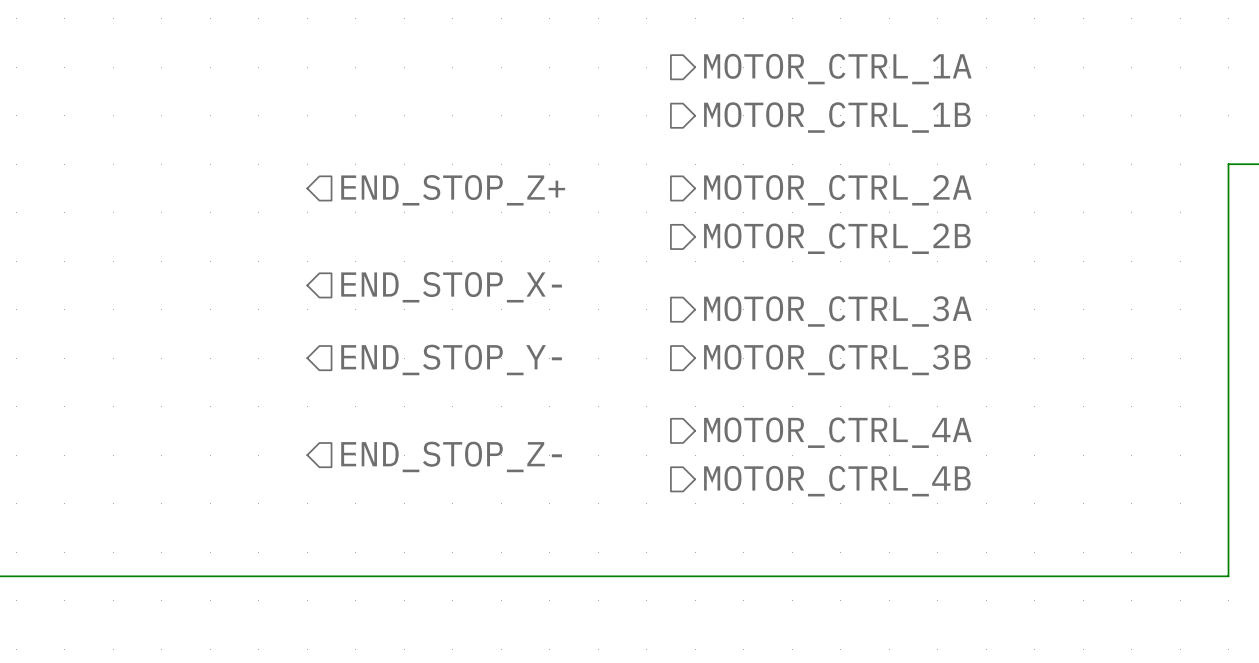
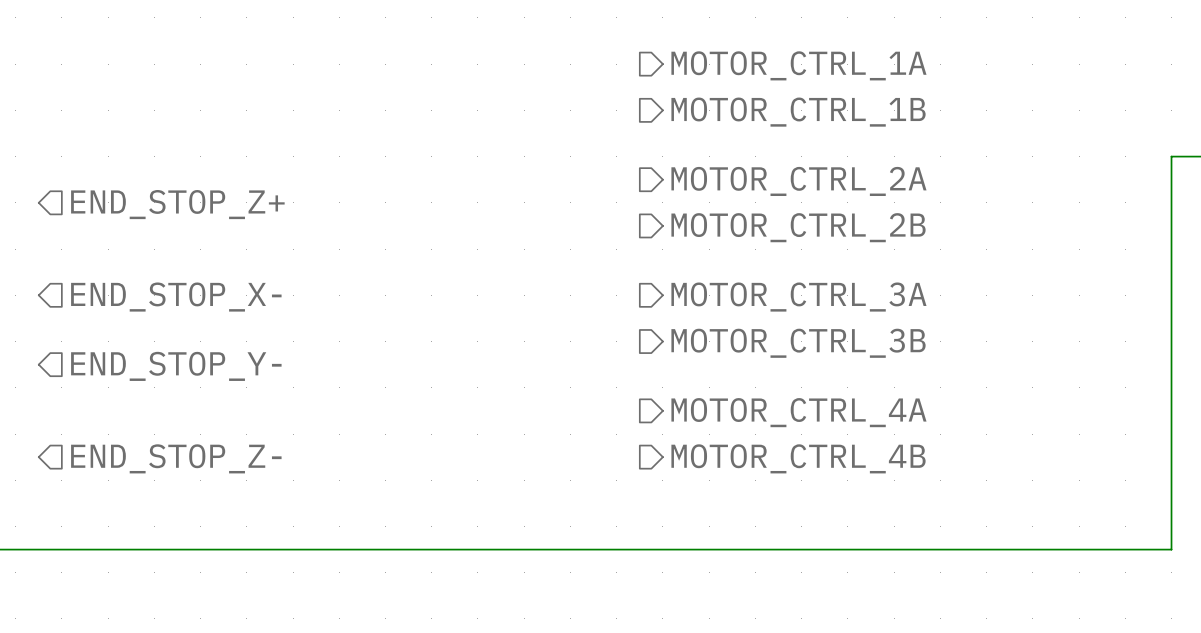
hierarchical label position: END_STOP_Z+ (453, 190) -> END_STOP_Z+ (177, 204)
hierarchical label position: END_STOP_X- (451, 287) -> END_STOP_X- (176, 297)
hierarchical label position: END_STOP_Y- (451, 359) -> END_STOP_Y- (176, 366)
hierarchical label position: END_STOP_Z- (451, 456) -> END_STOP_Z- (176, 458)

